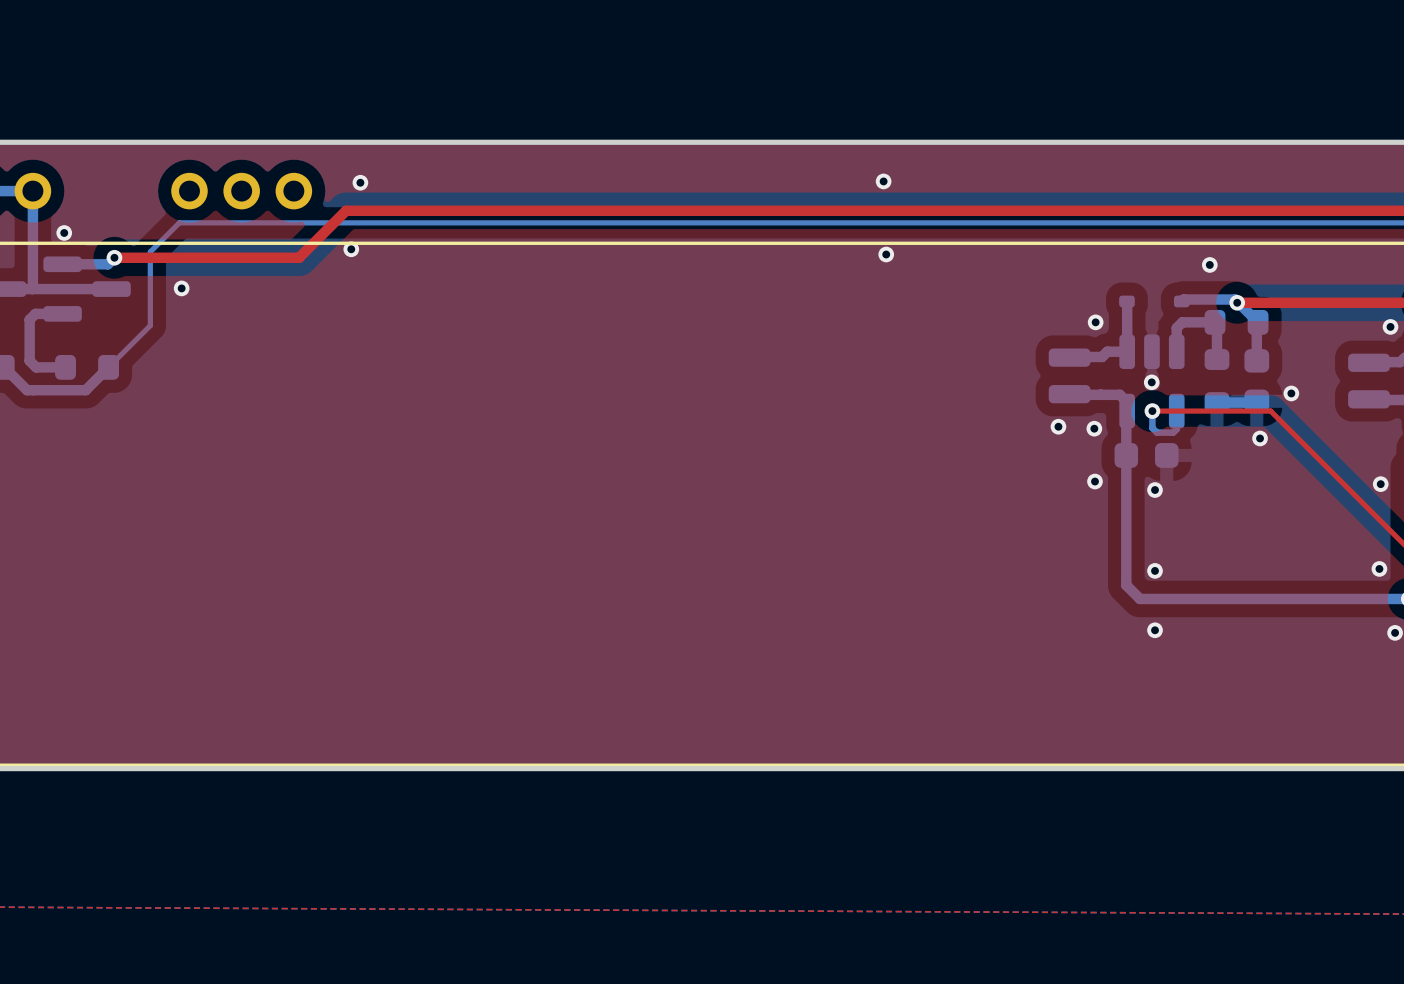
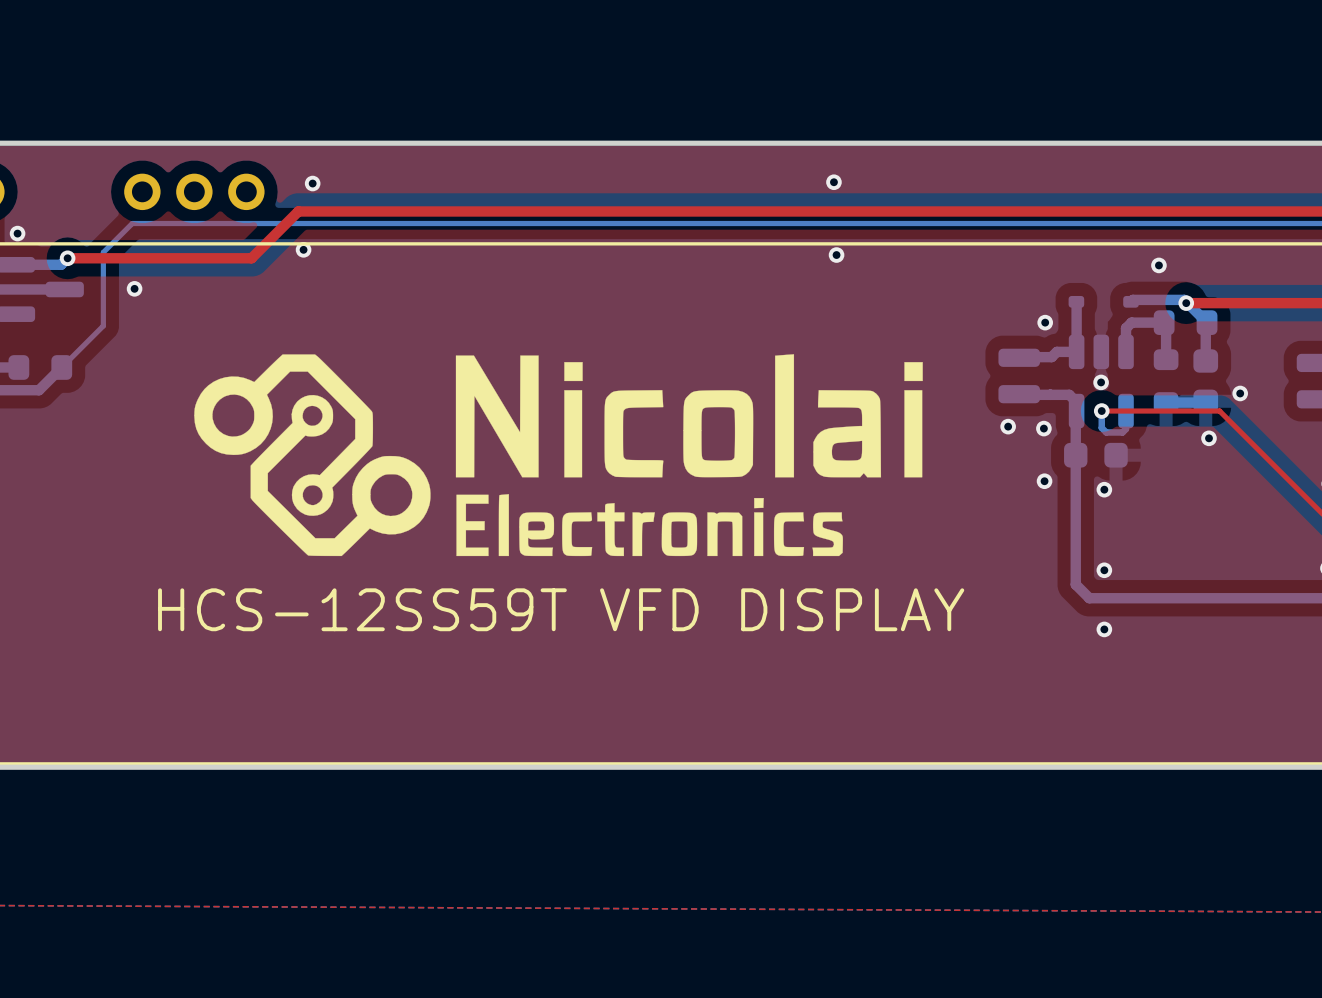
drawing: none -> [194, 354, 923, 557]
text: none -> HCS-12SS59T VFD DISPLAY (561, 609)

